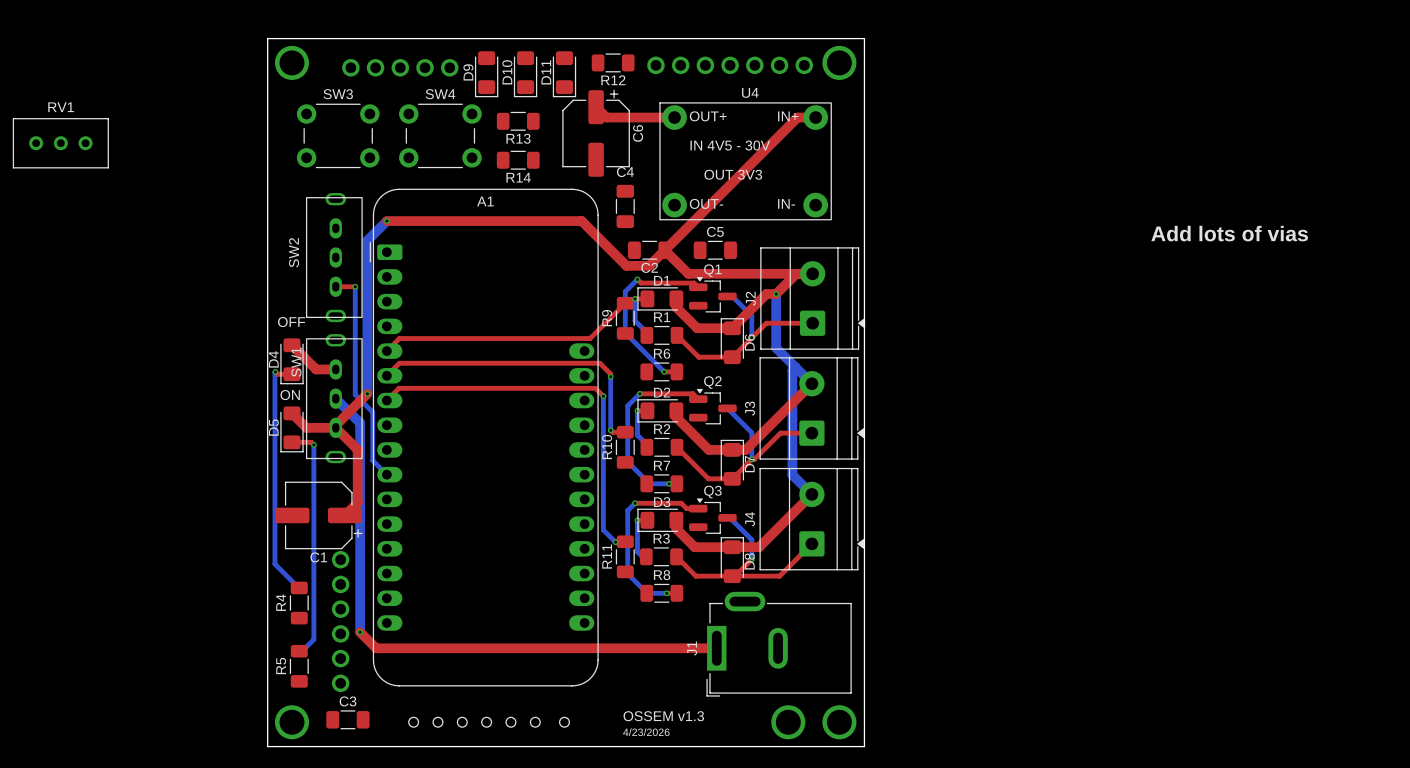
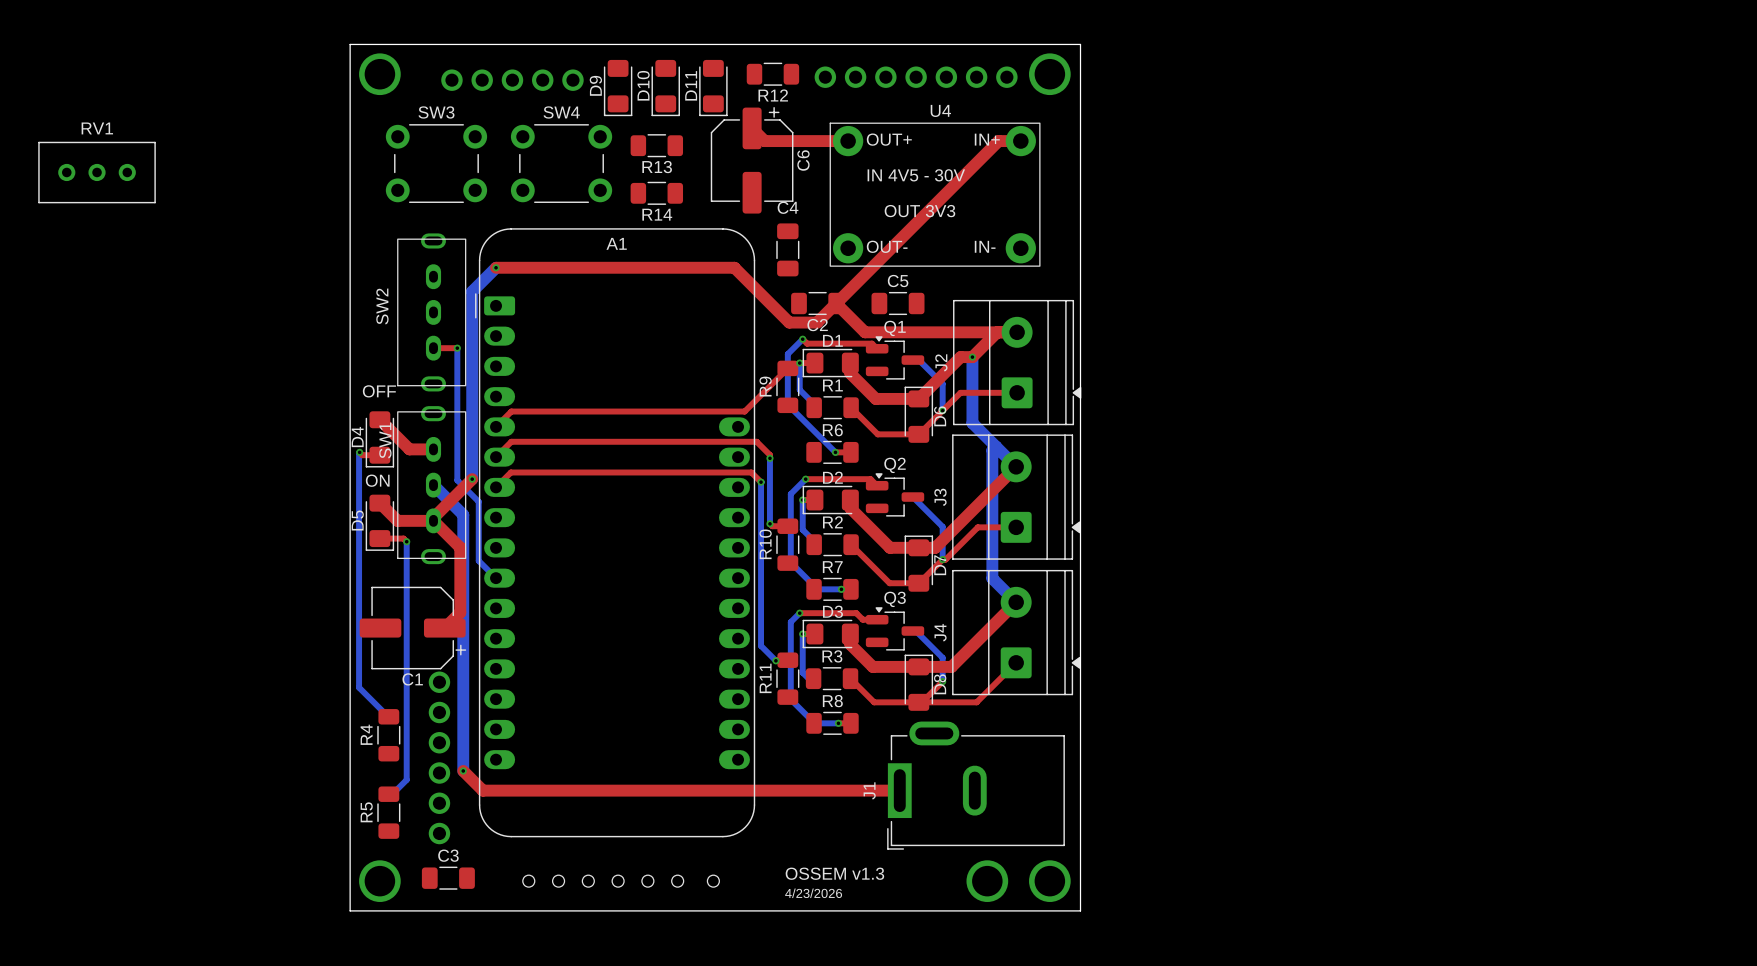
text: Add lots of vias (1229, 233) -> none

